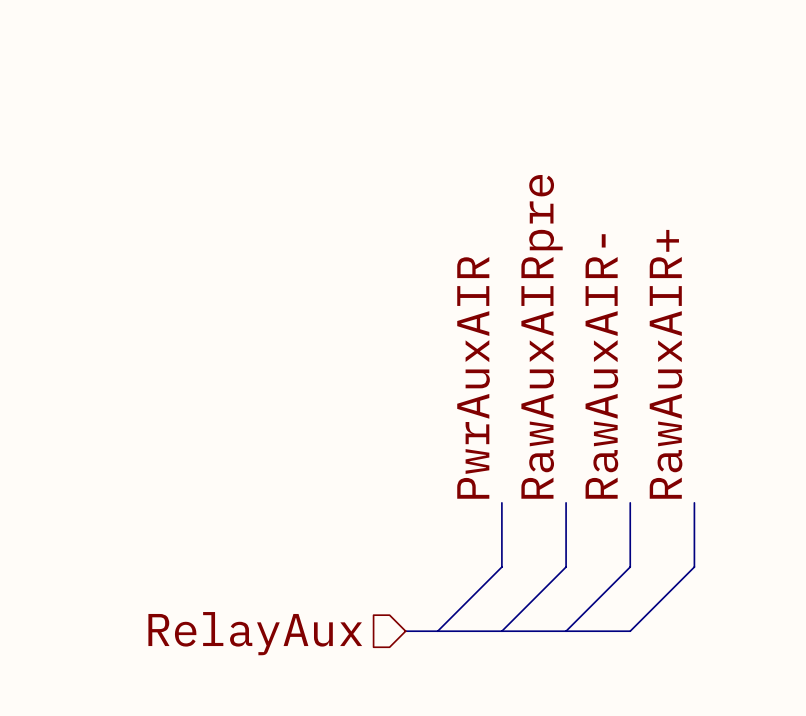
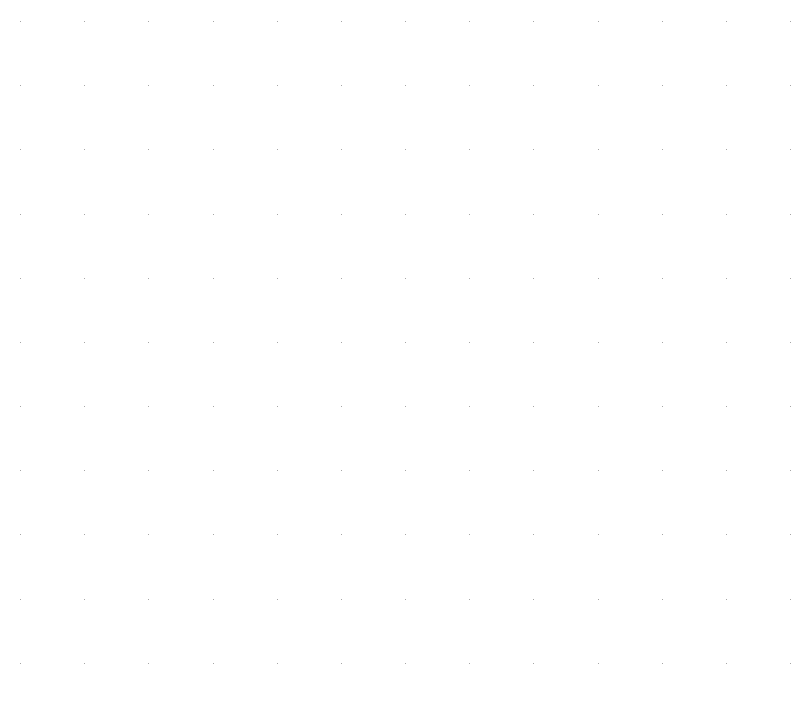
label: RawAuxAIRpre (542, 336) -> none
label: RawAuxAIR+ (666, 364) -> none
label: RawAuxAIR- (601, 366) -> none
label: PwrAuxAIR (473, 377) -> none
wire: (501, 502) (501, 567) (437, 631) -> none
wire: (566, 502) (566, 567) (501, 631) -> none
wire: (630, 502) (630, 567) (566, 631) -> none
wire: (694, 502) (694, 567) (630, 631) -> none
bus: (405, 631) (630, 631) -> none
hierarchical label: RelayAux (255, 633) -> none

